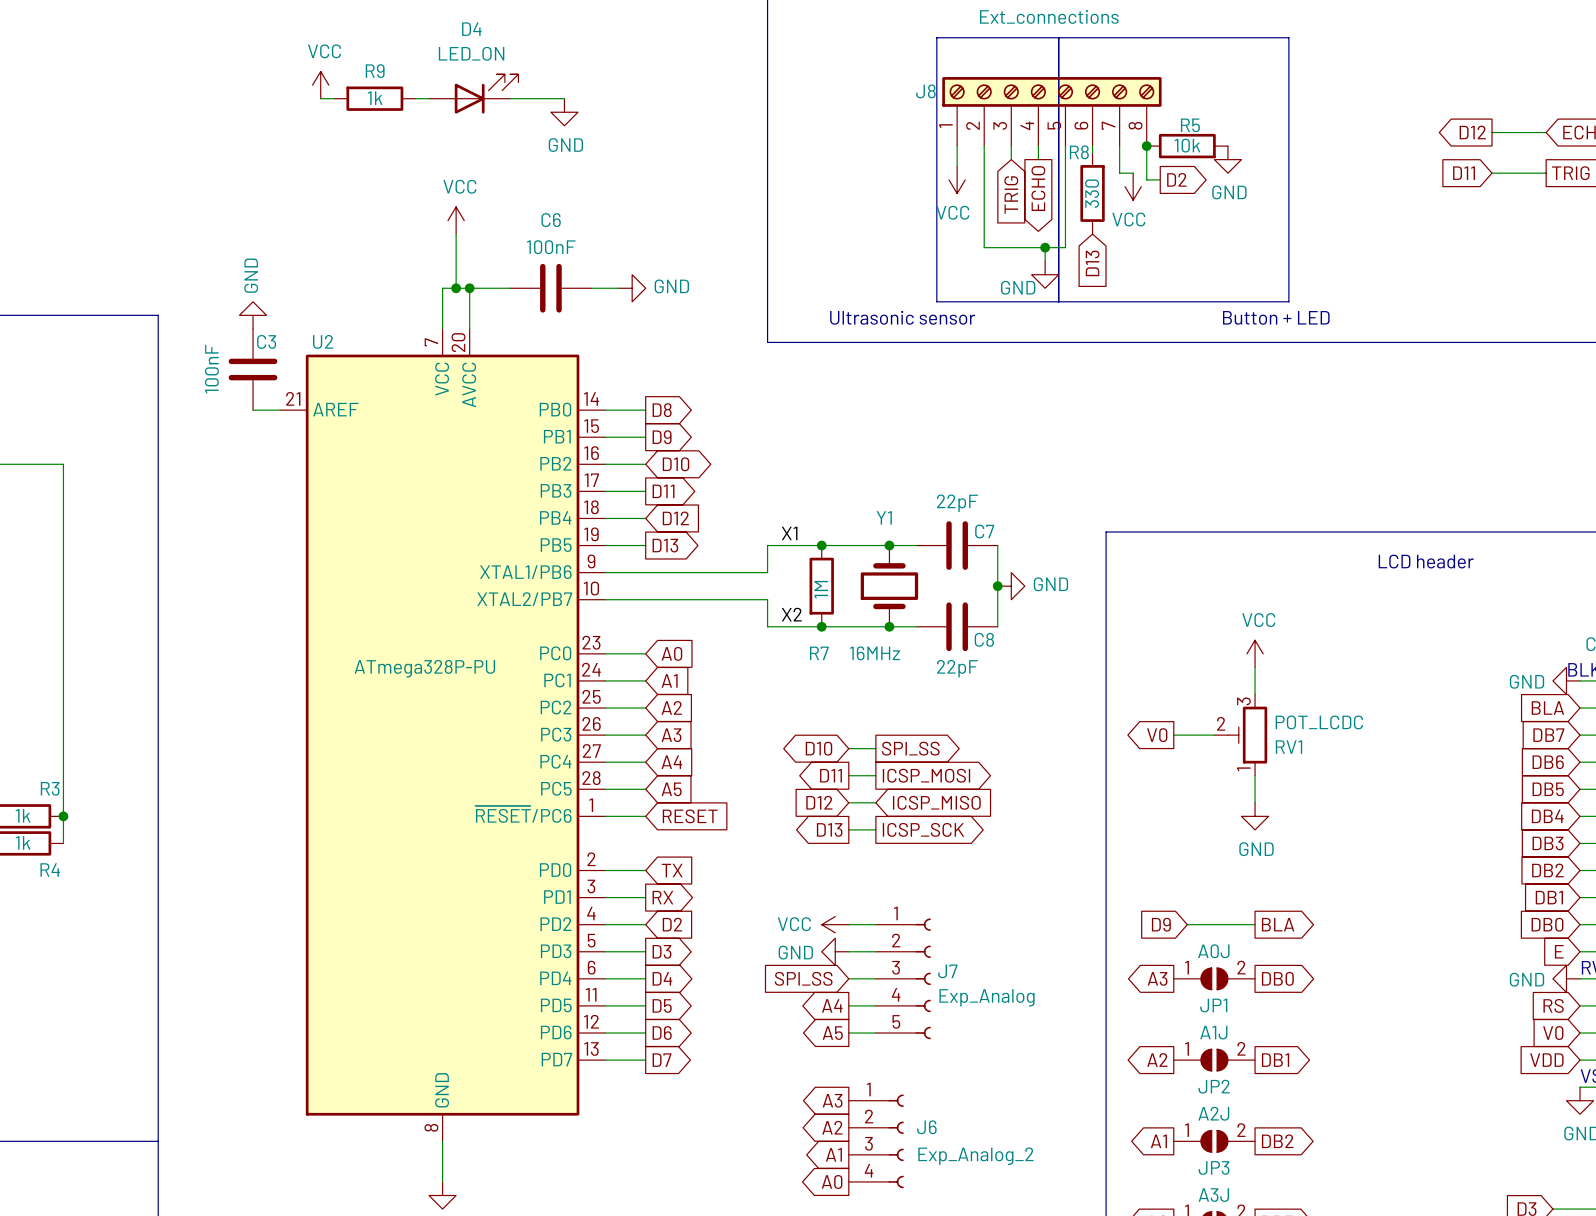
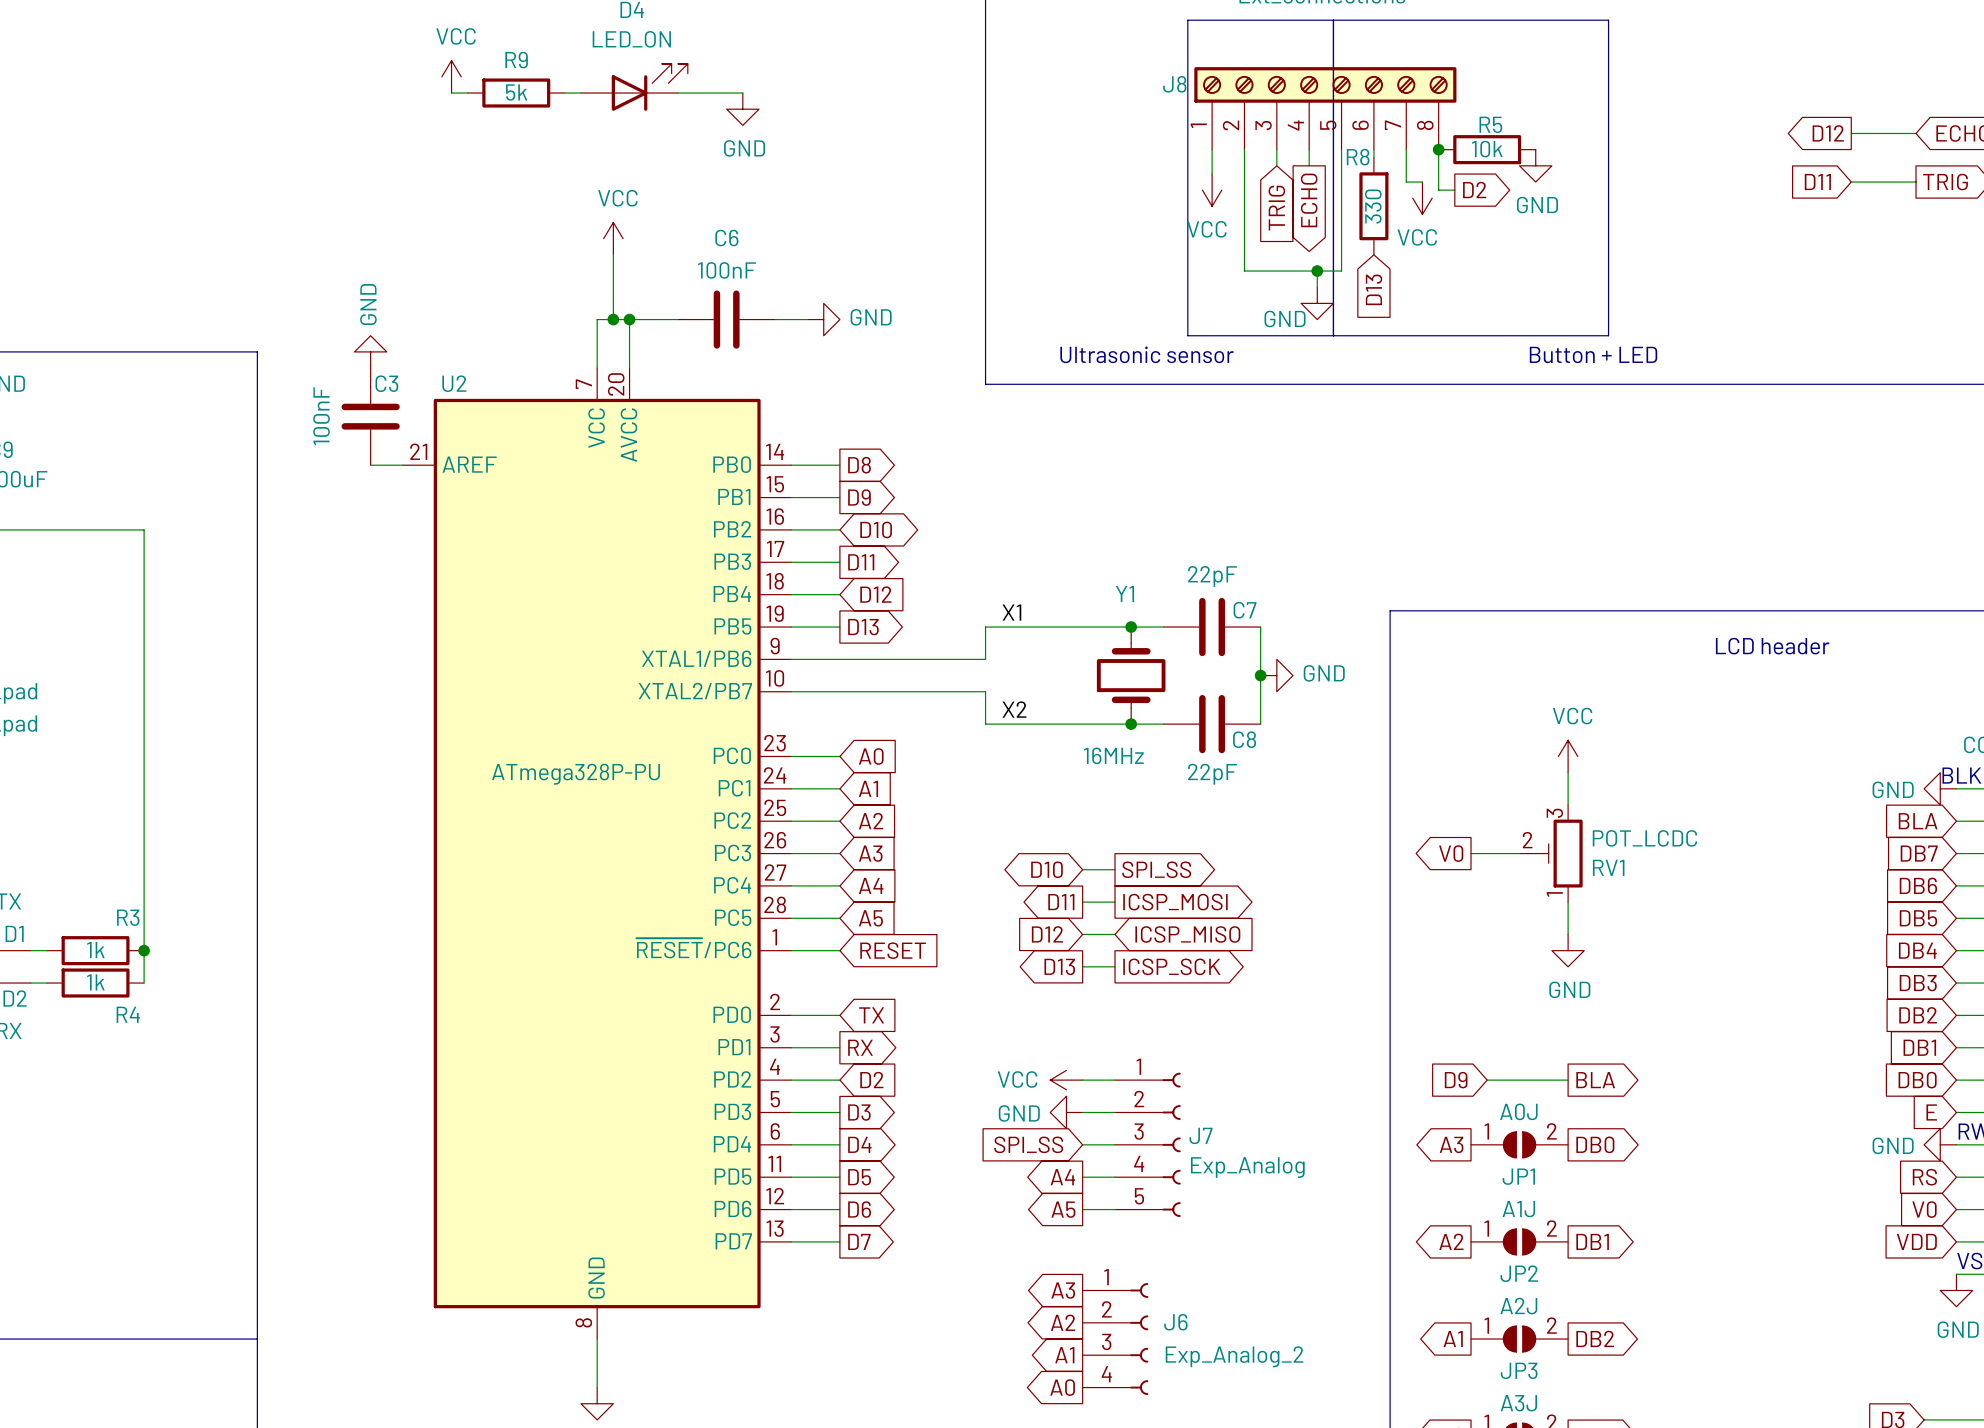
R9 value: 1k (375, 98) -> 5k (516, 92)
junction: (821, 545) -> none
R7: 1M (821, 586) -> none
junction: (821, 626) -> none

